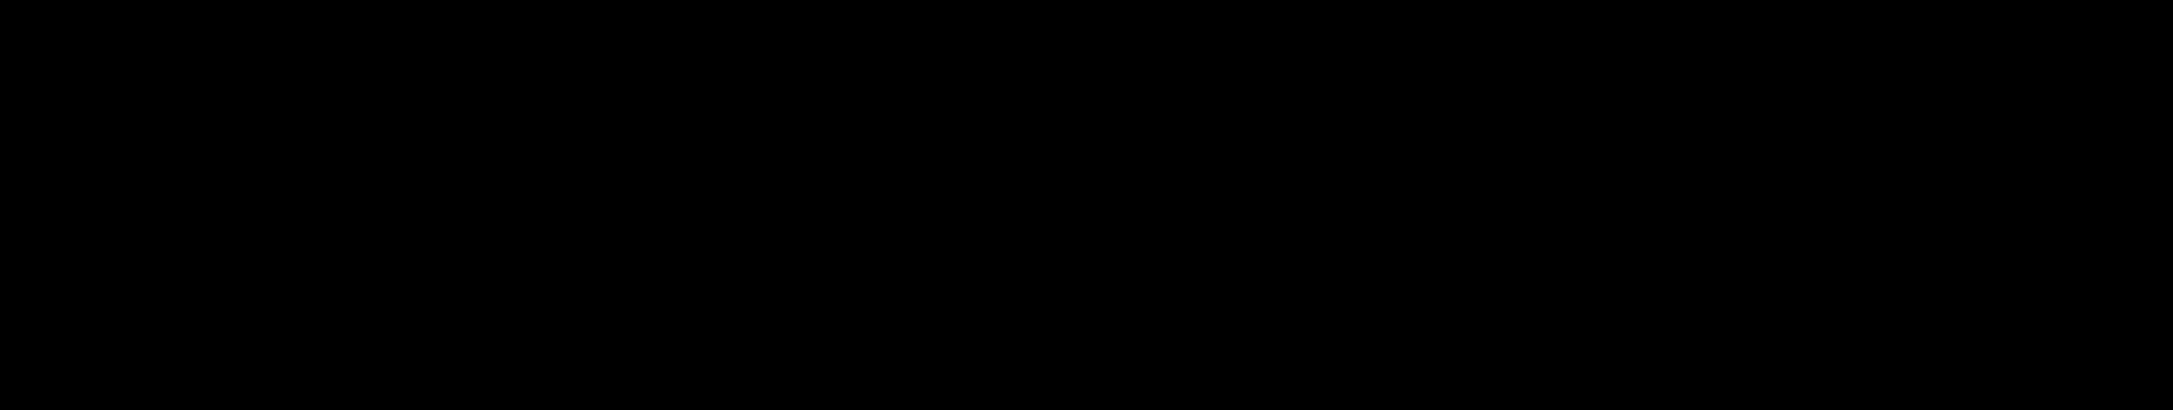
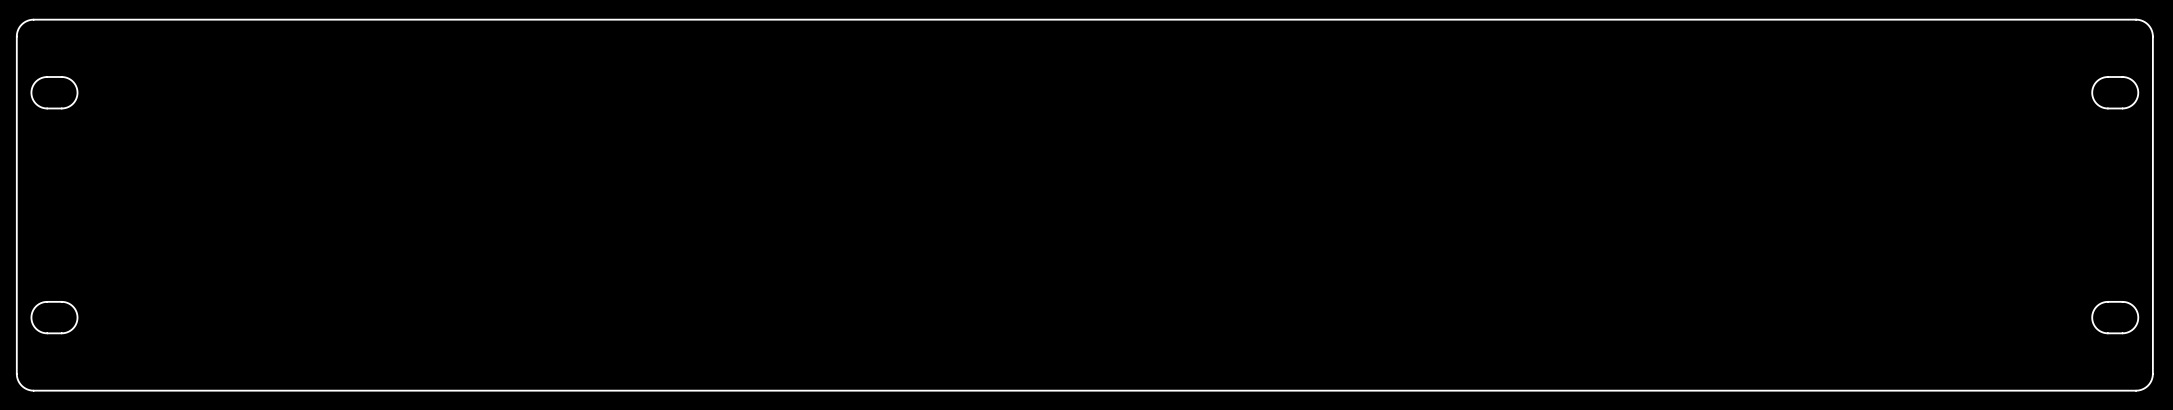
board edge: none -> (33, 19) (2137, 19) (2147, 24) (2152, 36) (2152, 375) (2147, 385) (2136, 390) (31, 390) (20, 384) (16, 373) (16, 36) (21, 24) (33, 19)
board edge: none -> (47, 77) (65, 77) (73, 82) (77, 94) (72, 104) (63, 108) (47, 108) (35, 103) (31, 94) (33, 85) (39, 78) (47, 77)
board edge: none -> (2107, 77) (2124, 77) (2133, 81) (2138, 92) (2133, 103) (2124, 108) (2107, 108) (2096, 103) (2092, 94) (2094, 85) (2100, 78) (2107, 77)
board edge: none -> (47, 301) (65, 302) (73, 307) (77, 319) (72, 329) (63, 333) (47, 333) (36, 328) (31, 321) (32, 311) (37, 305) (47, 301)
board edge: none -> (2107, 301) (2124, 301) (2133, 306) (2138, 317) (2133, 328) (2124, 333) (2107, 333) (2096, 328) (2092, 319) (2094, 310) (2100, 303) (2107, 301)

